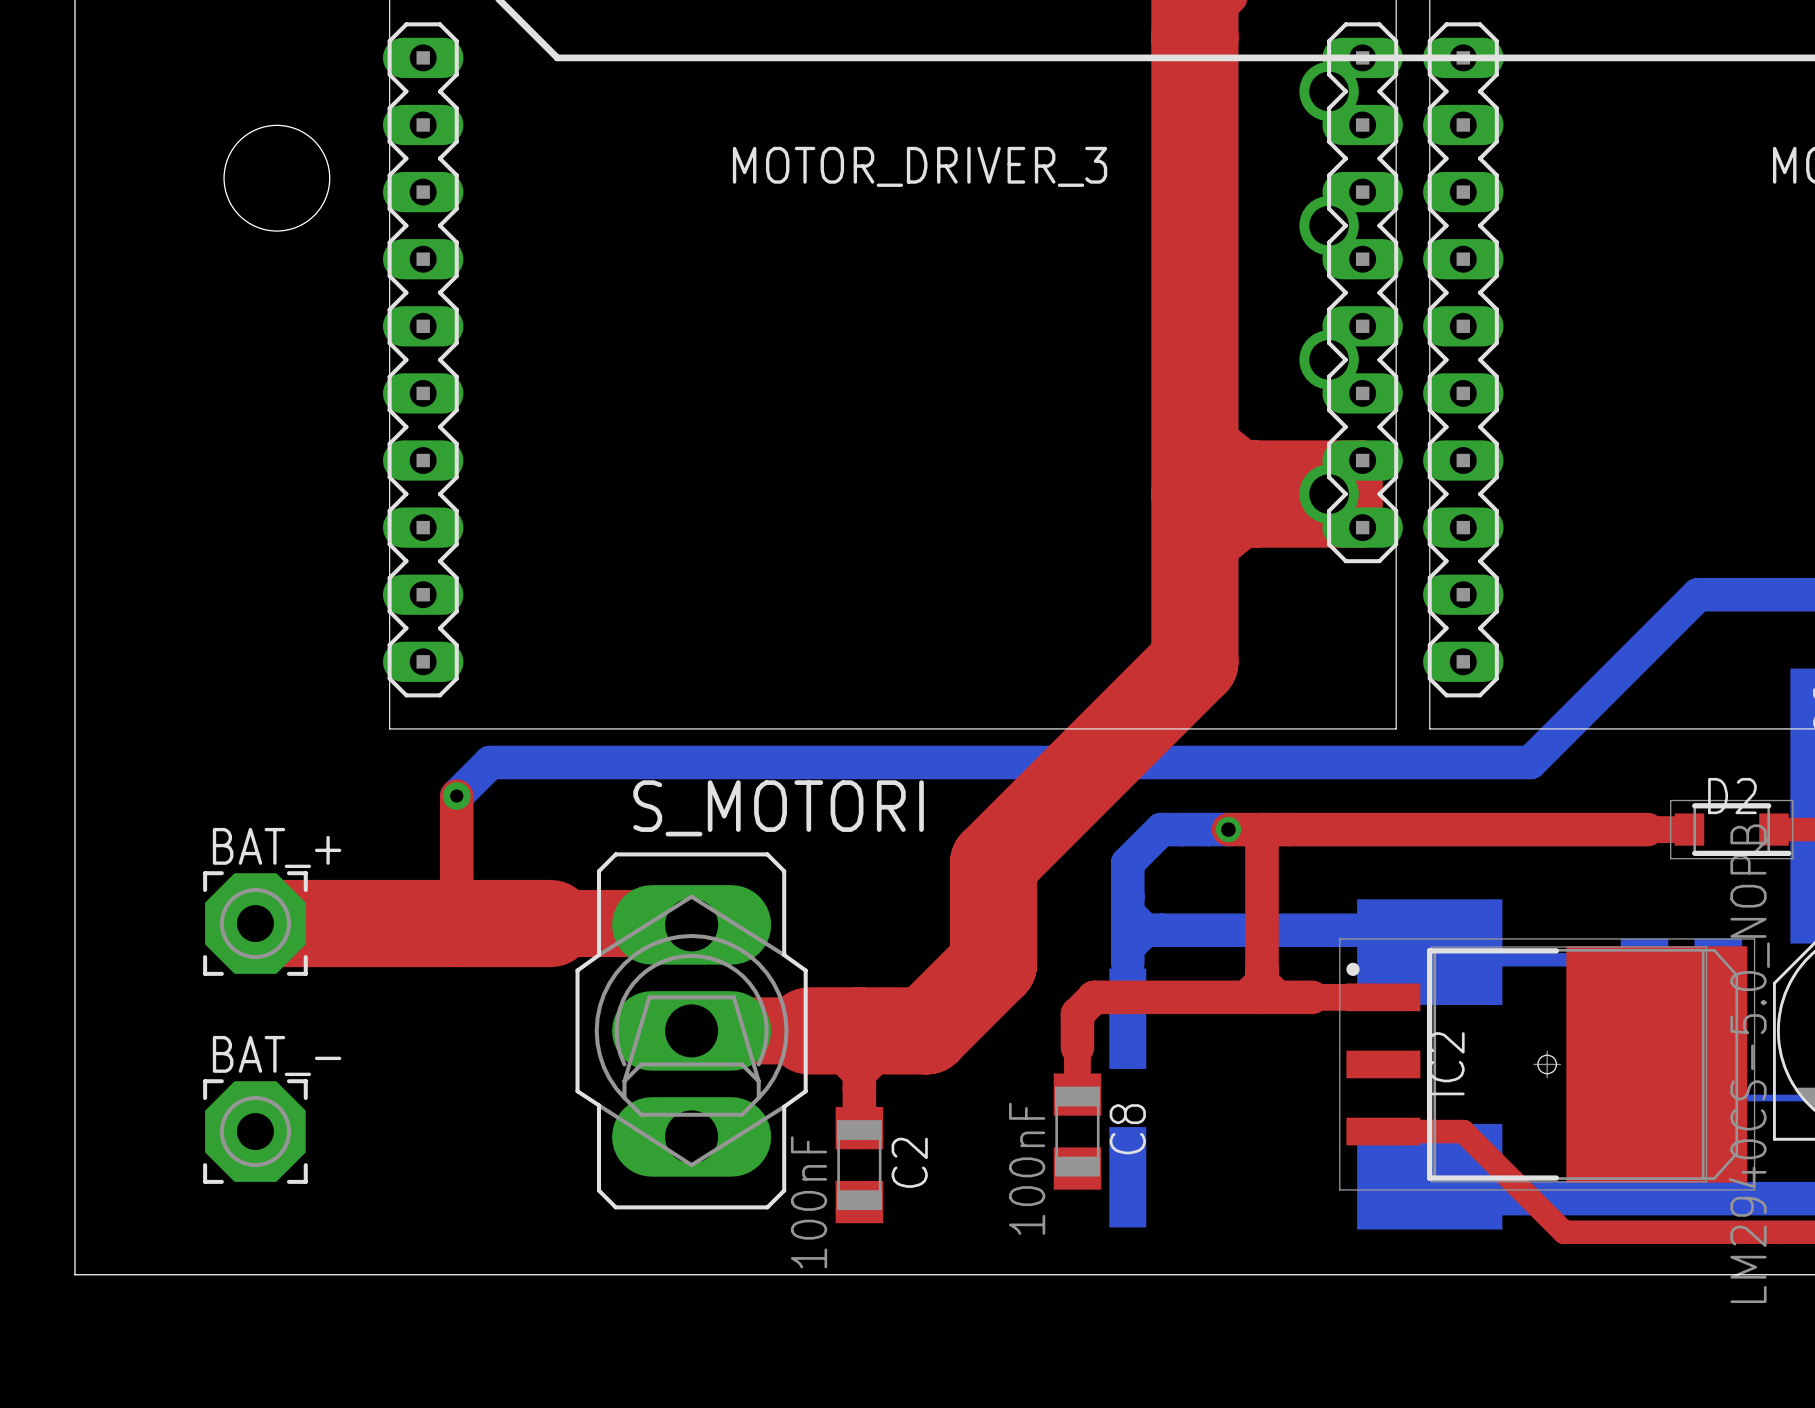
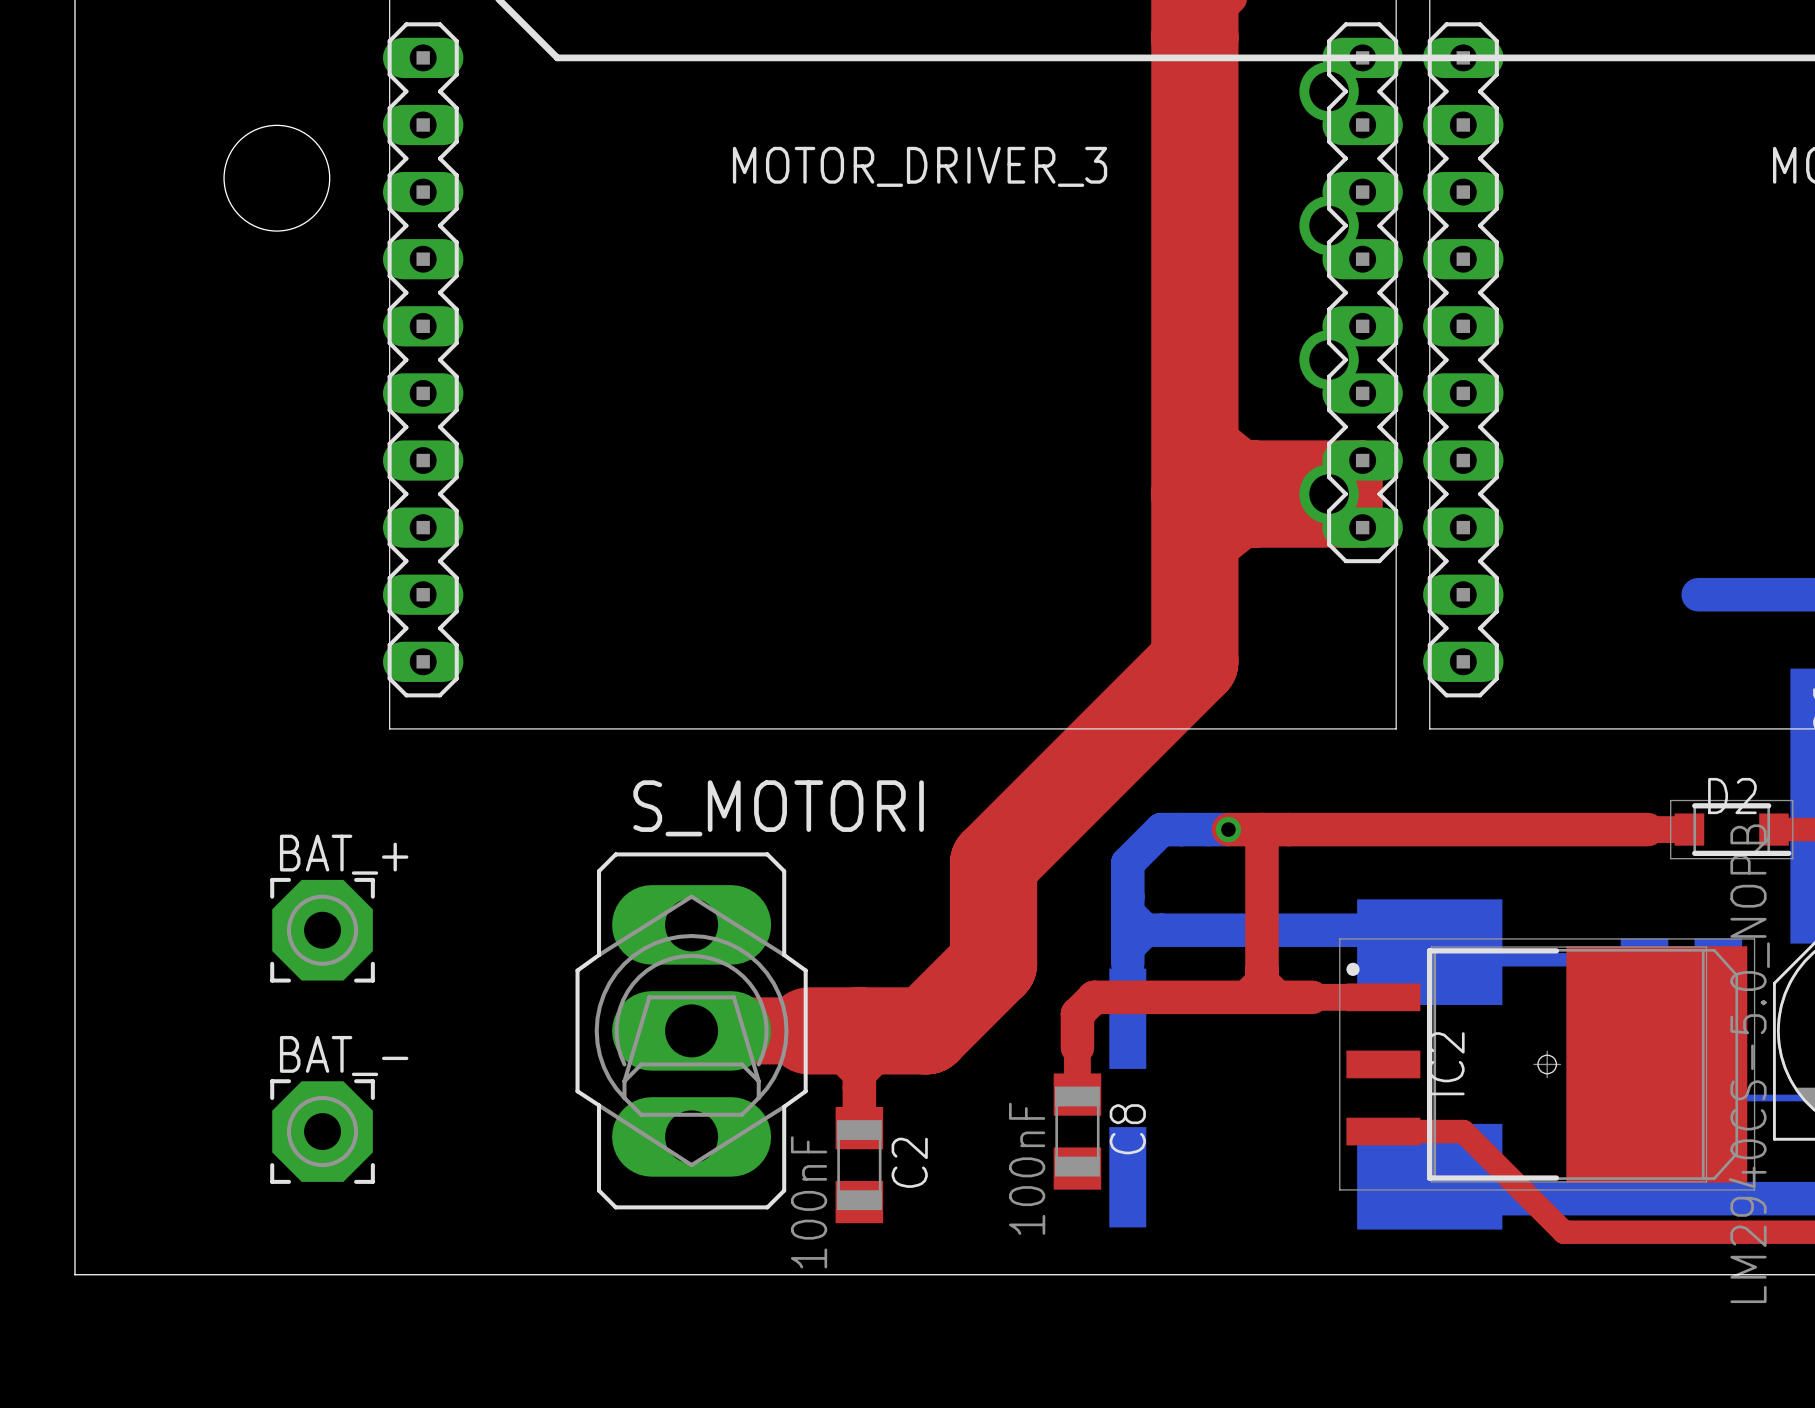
bottom track: (1698, 594) (1530, 762) (490, 762) (456, 796) -> none
top track: (456, 796) (456, 923) -> none
via: (456, 796) -> none
top track: (255, 923) (691, 924) -> none
BAT_+ position: (255, 923) -> (322, 930)
BAT_- position: (255, 1131) -> (322, 1131)

